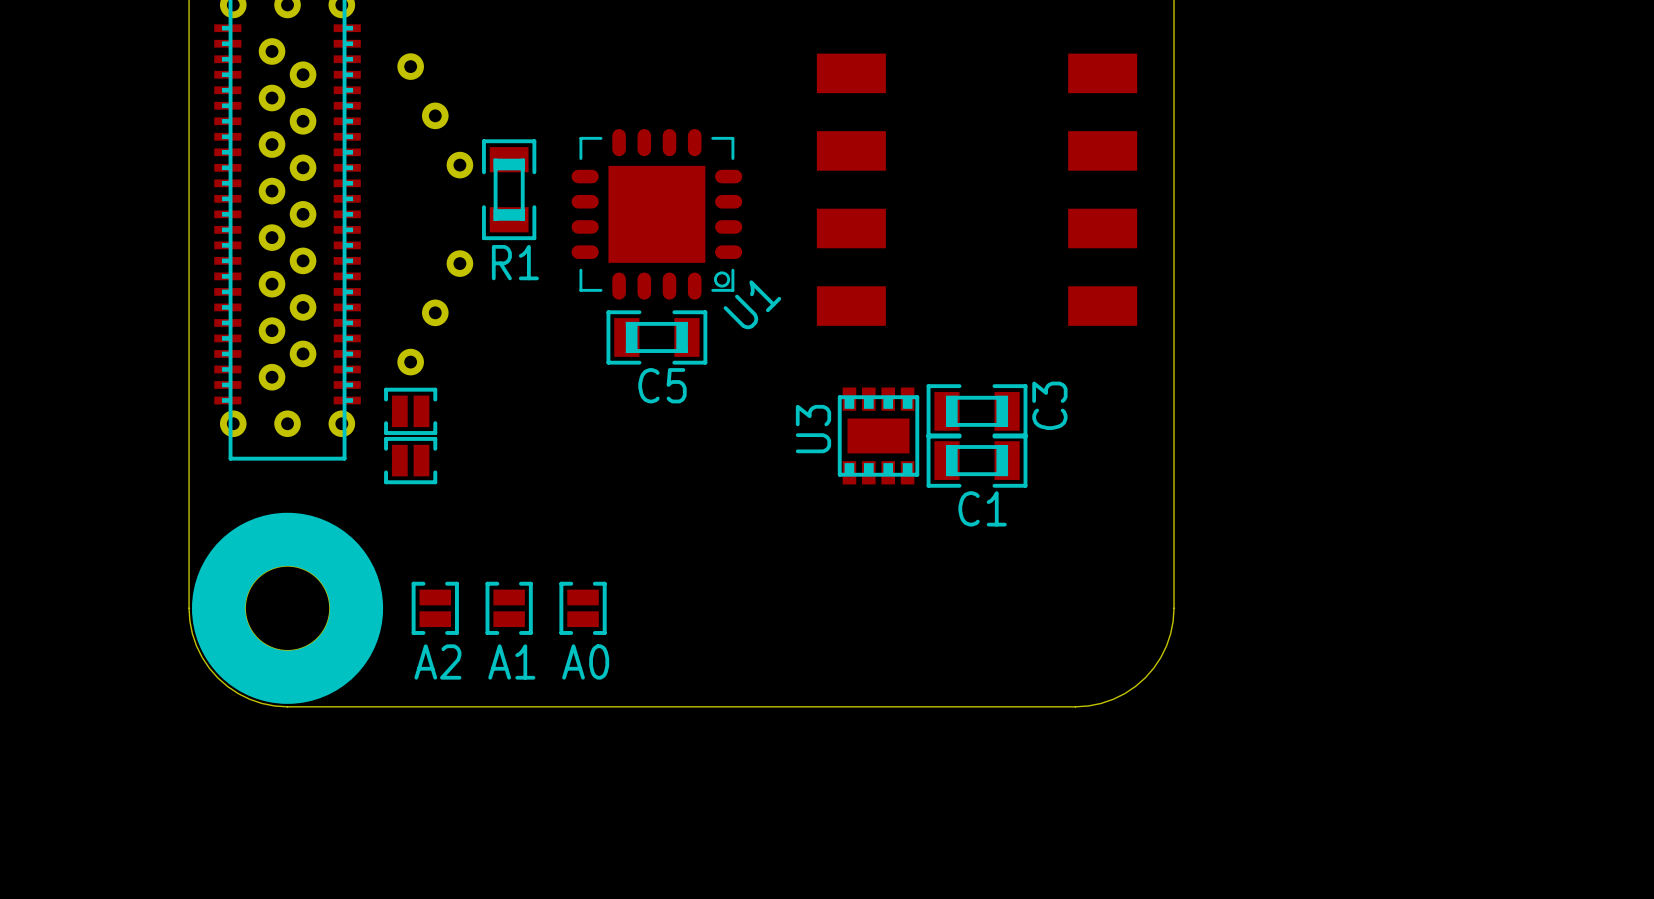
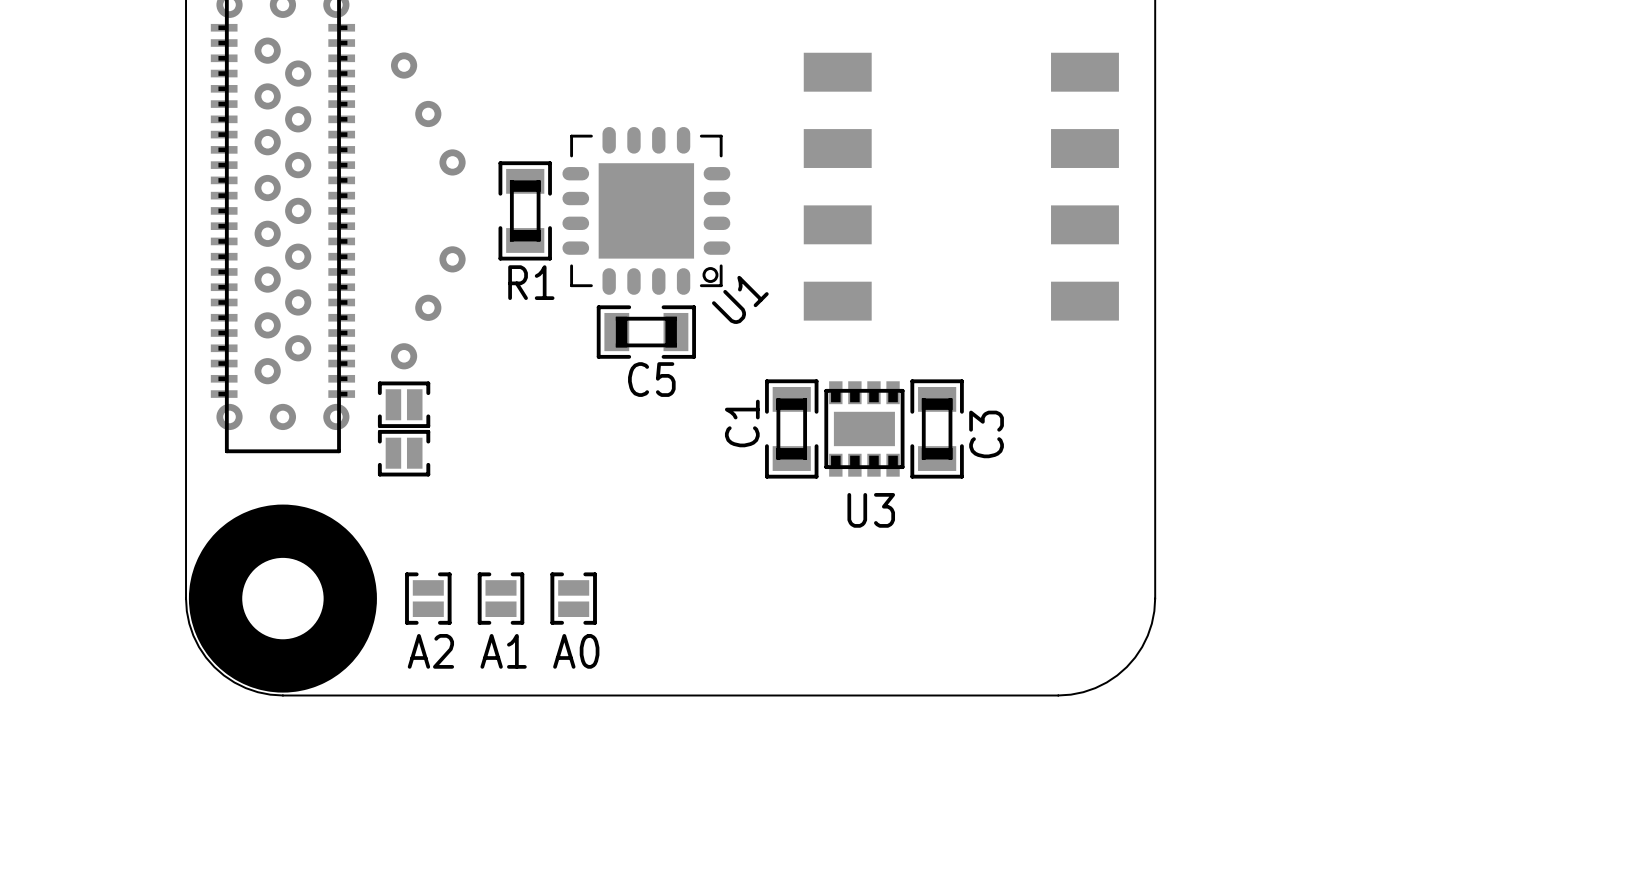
R1 position: (509, 189) -> (525, 210)
C3 rotation: 0° (977, 411) -> 90° clockwise (937, 428)
U3 name rotation: 0° (813, 429) -> 90° clockwise (871, 510)
U3 name position: U3 (813, 429) -> U3 (871, 510)
C1 rotation: 0° (977, 460) -> 90° clockwise (791, 428)
C1 position: (977, 460) -> (791, 428)

